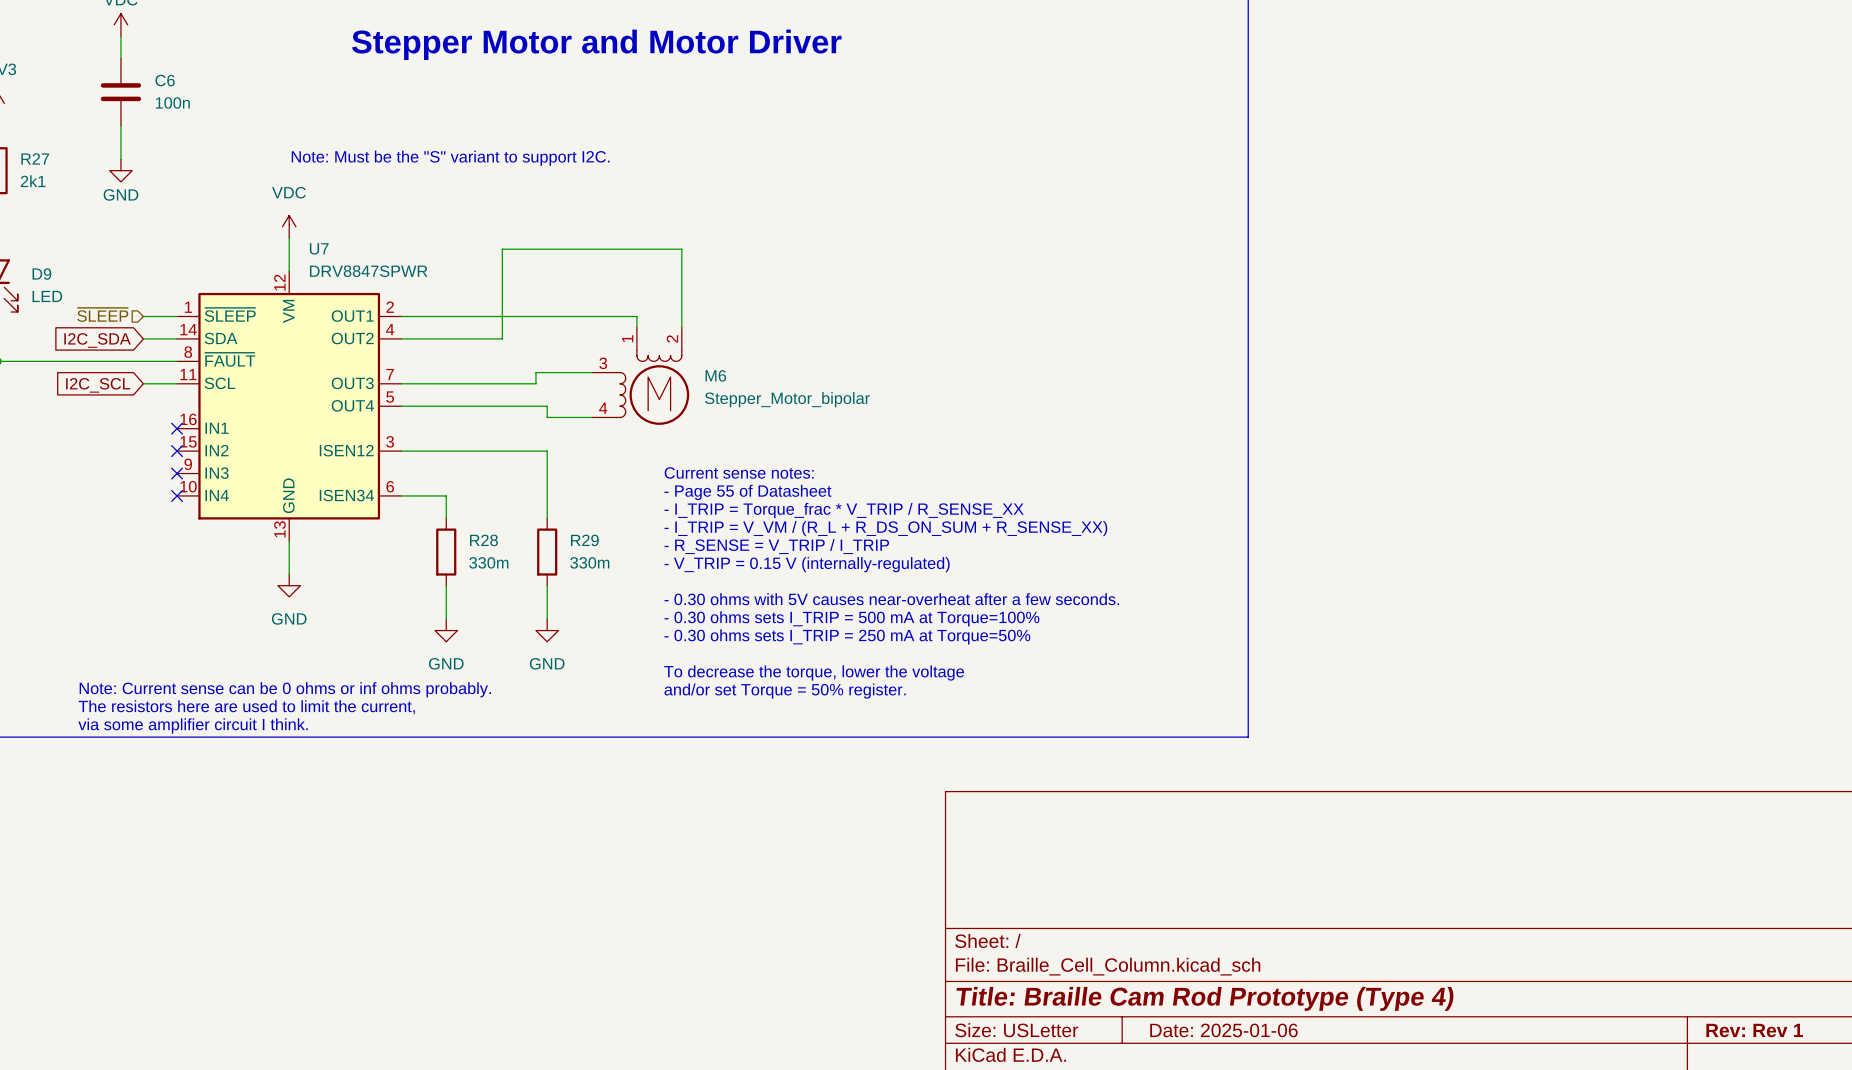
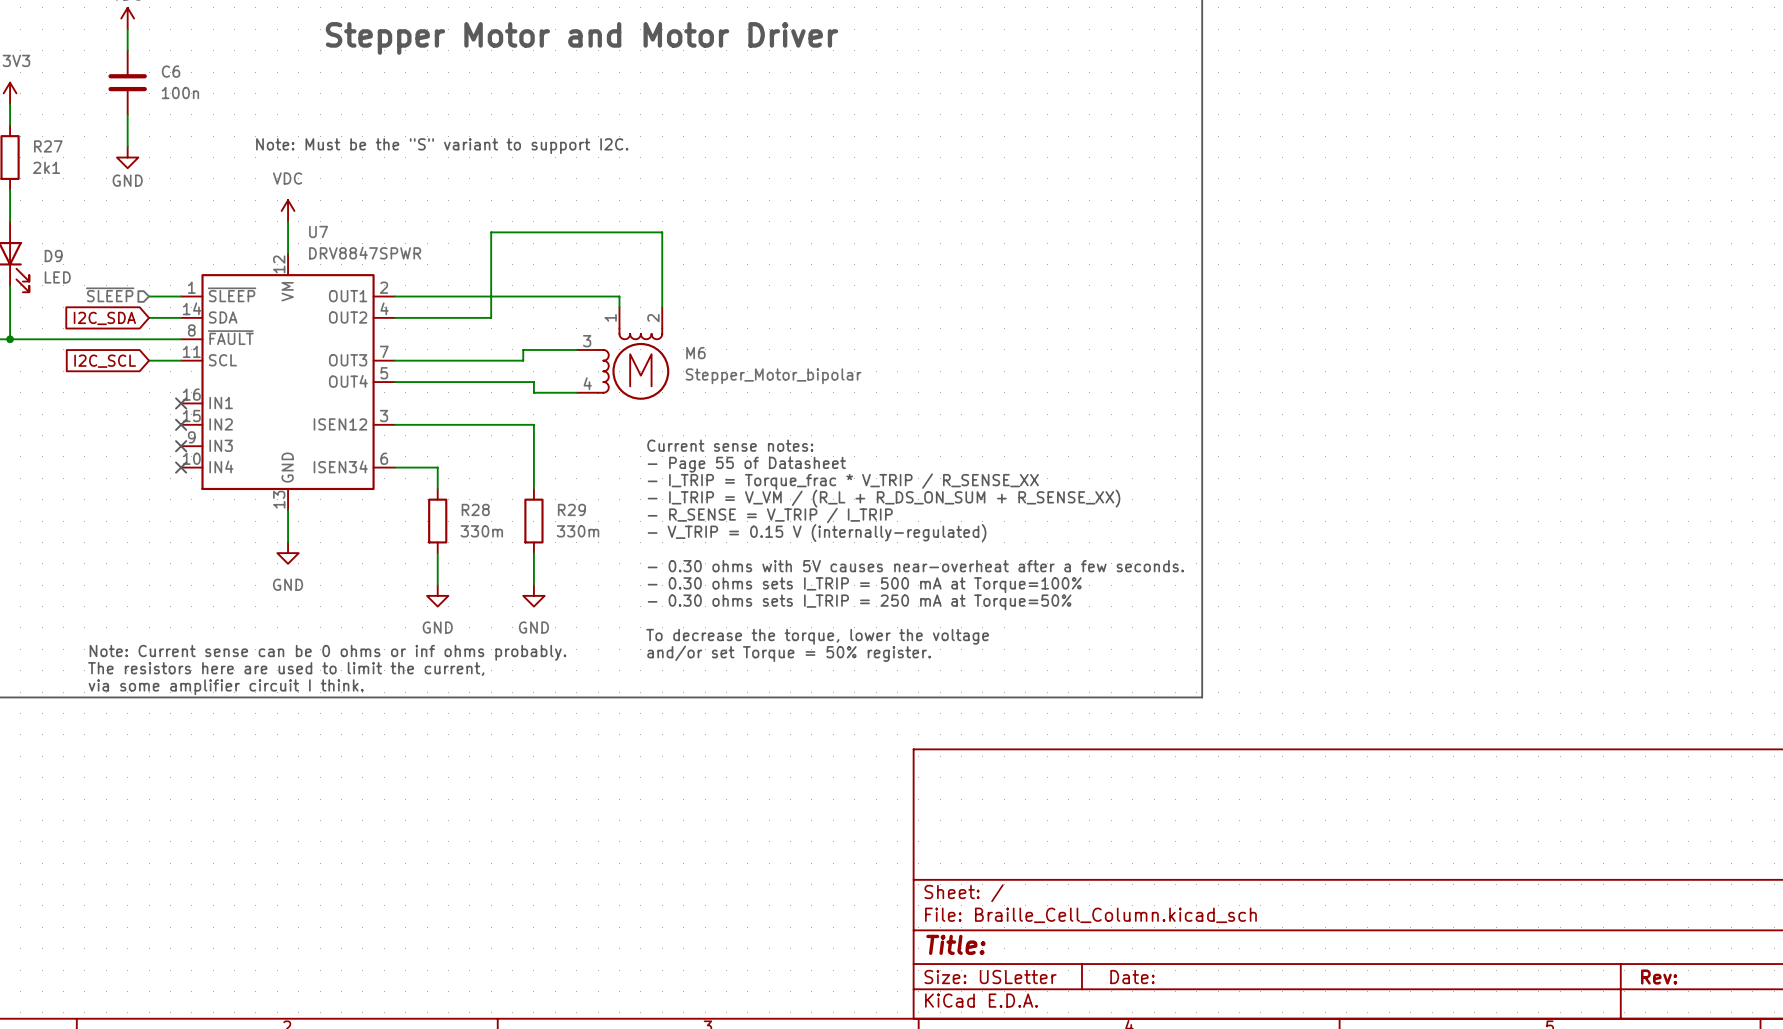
title block: Title: Braille Cam Rod Prototype (Type 4) (1205, 998) -> Title: (955, 944)
title block: Date: 2025-01-06 (1223, 1030) -> Date: (1132, 977)
title block: Rev: Rev 1 (1754, 1030) -> Rev: (1659, 977)

